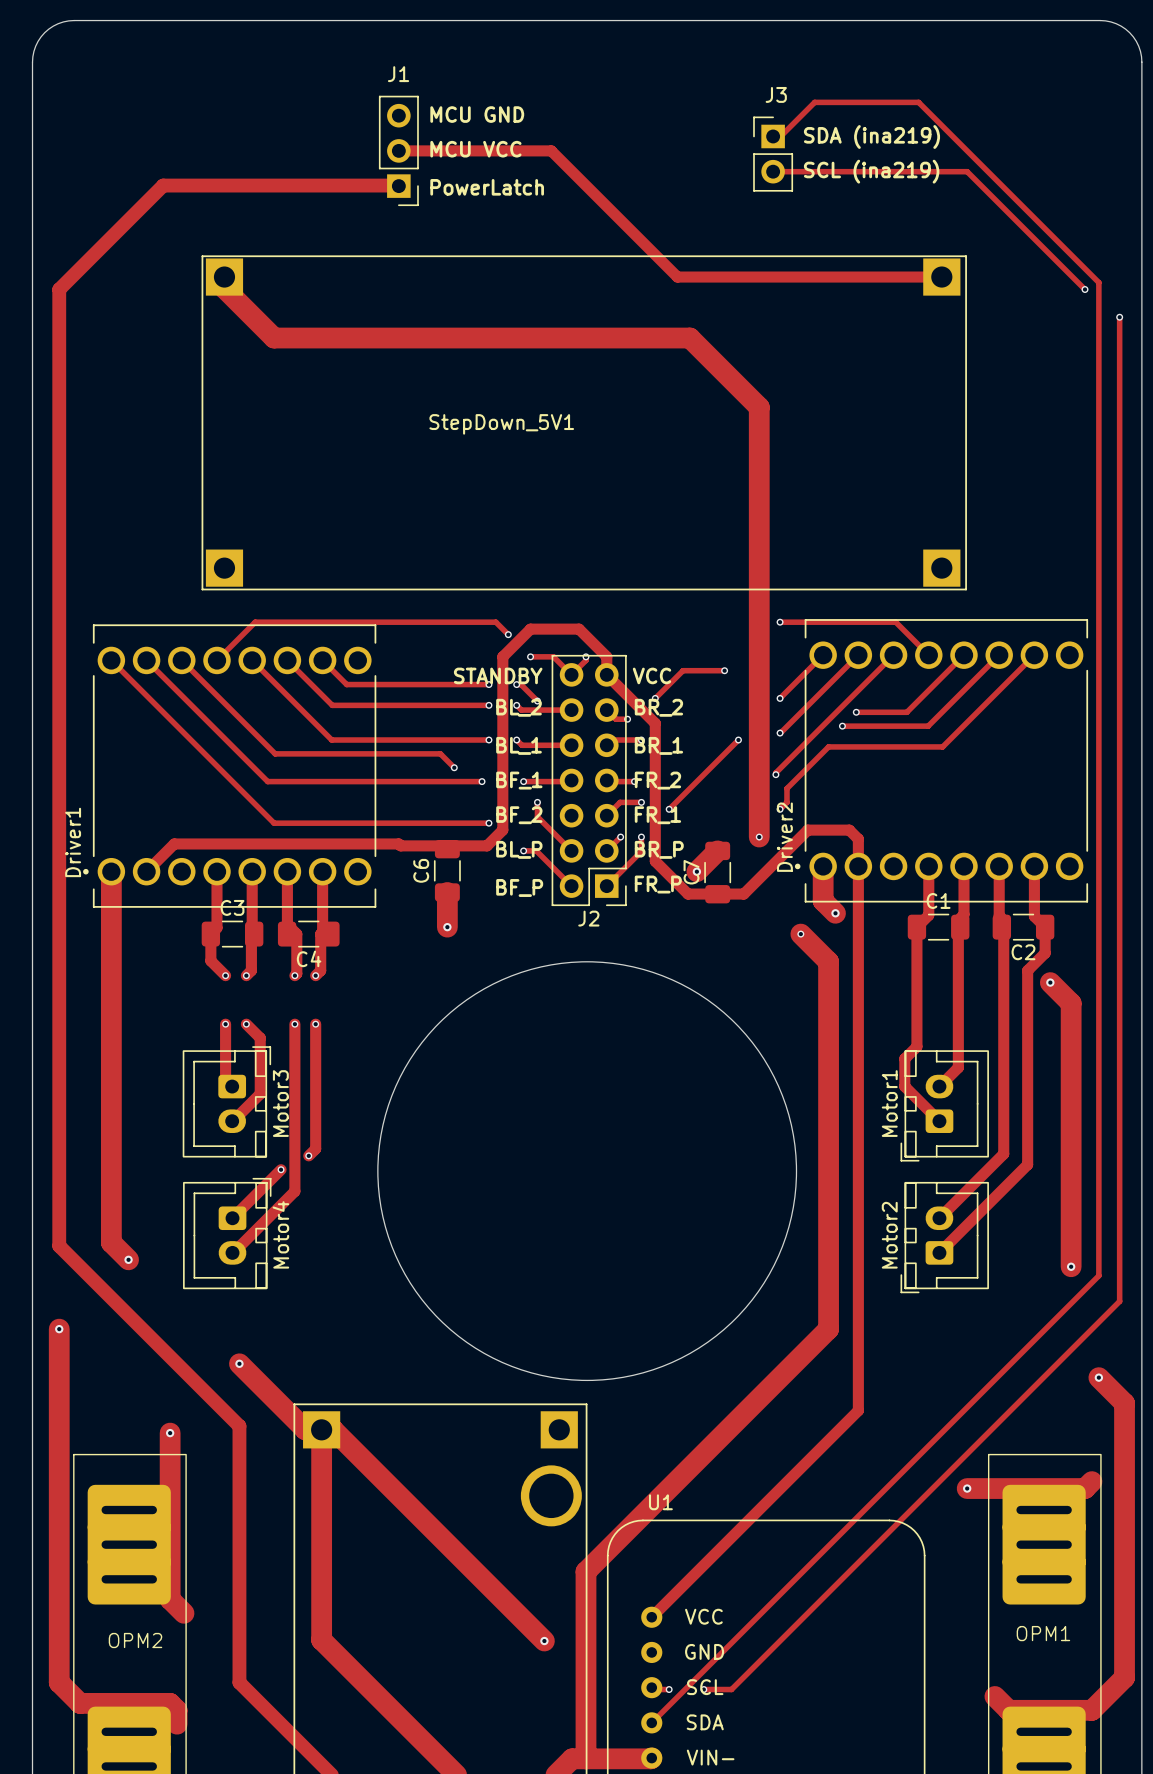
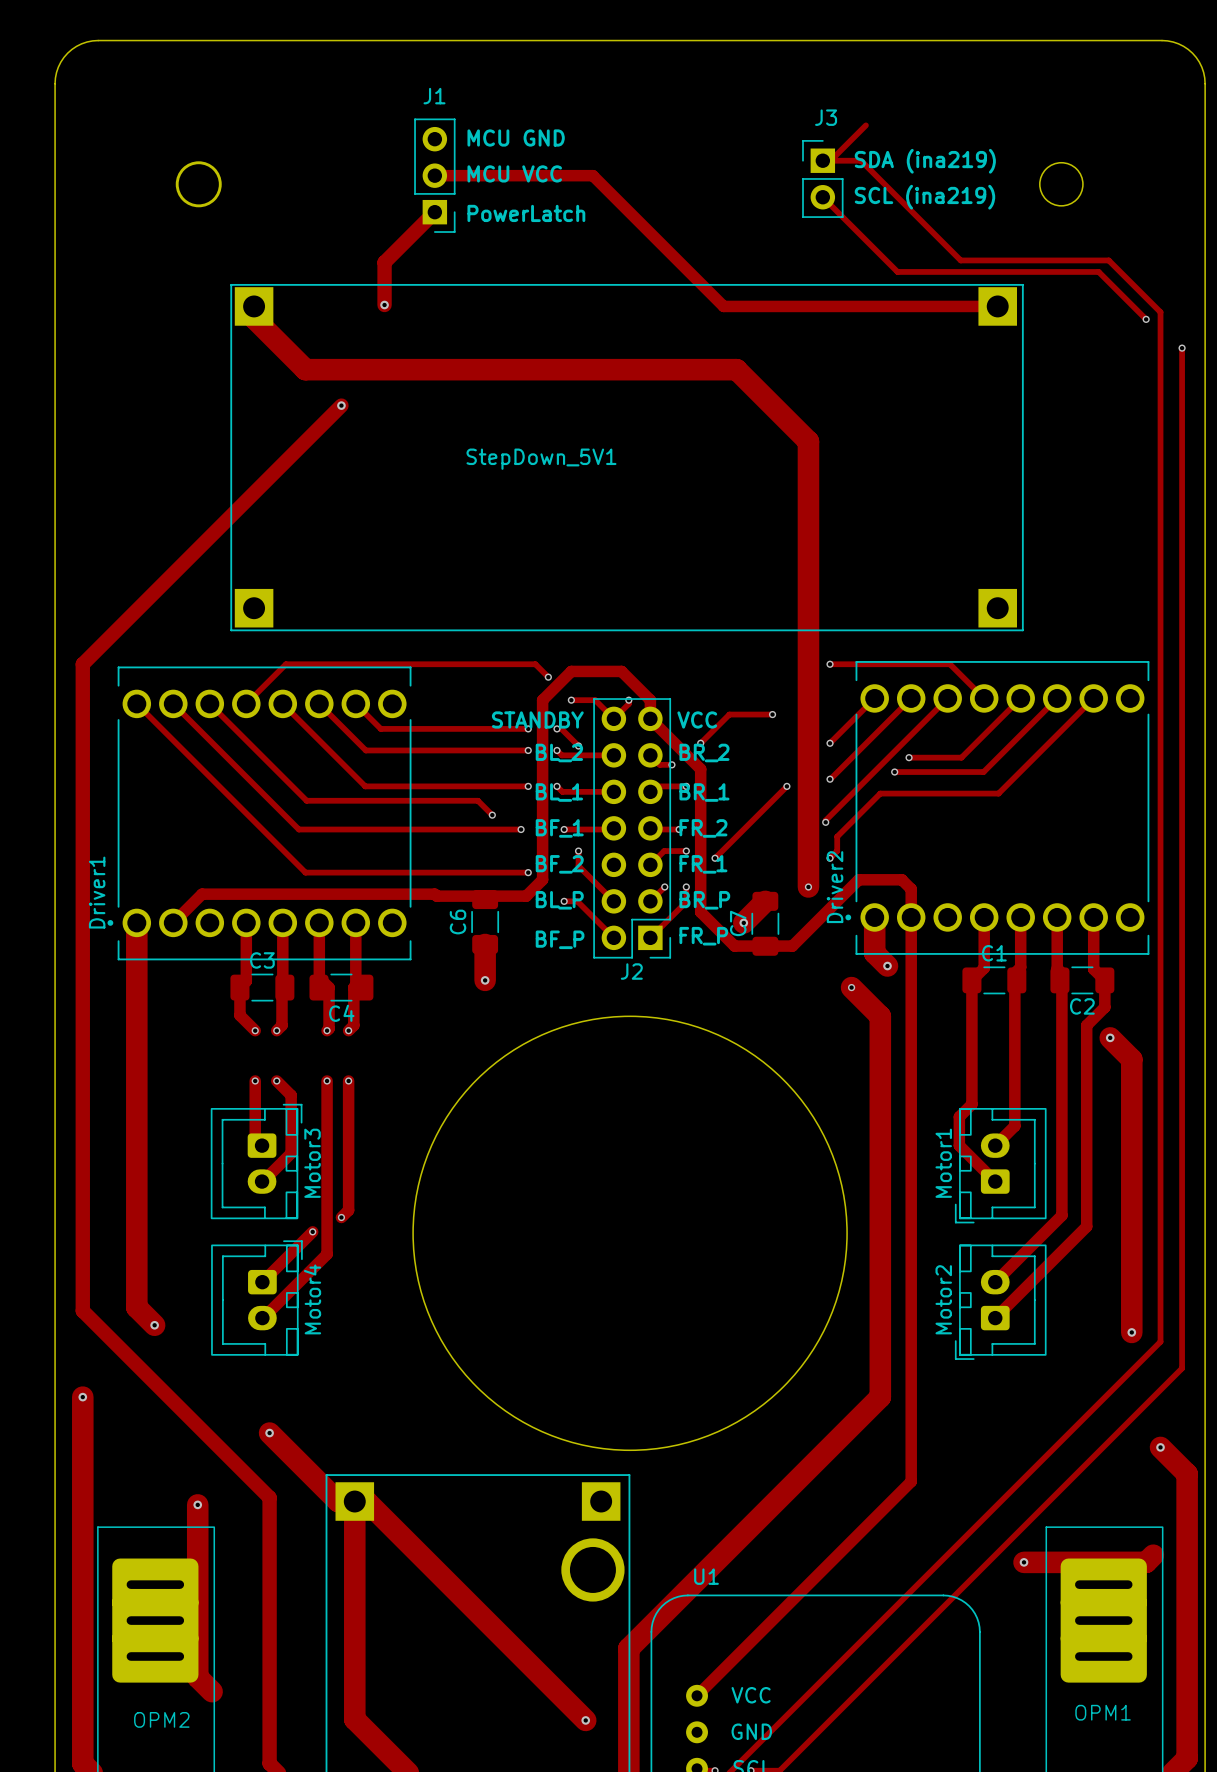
track: (814, 102) (918, 102) (1048, 232) -> (830, 160) (861, 160) (960, 260) (1108, 260)
round board edge: none -> [175, 161, 222, 208]
round board edge: none -> [1039, 162, 1084, 207]
track: (773, 171) (967, 171) (1039, 243) -> (822, 197) (897, 271) (1098, 271)
track: (398, 185) (163, 185) (59, 289) (59, 622) -> (341, 405) (82, 664)
track: none -> (434, 212) (384, 262) (384, 305)
via: none -> (384, 305)
via: none -> (341, 405)

